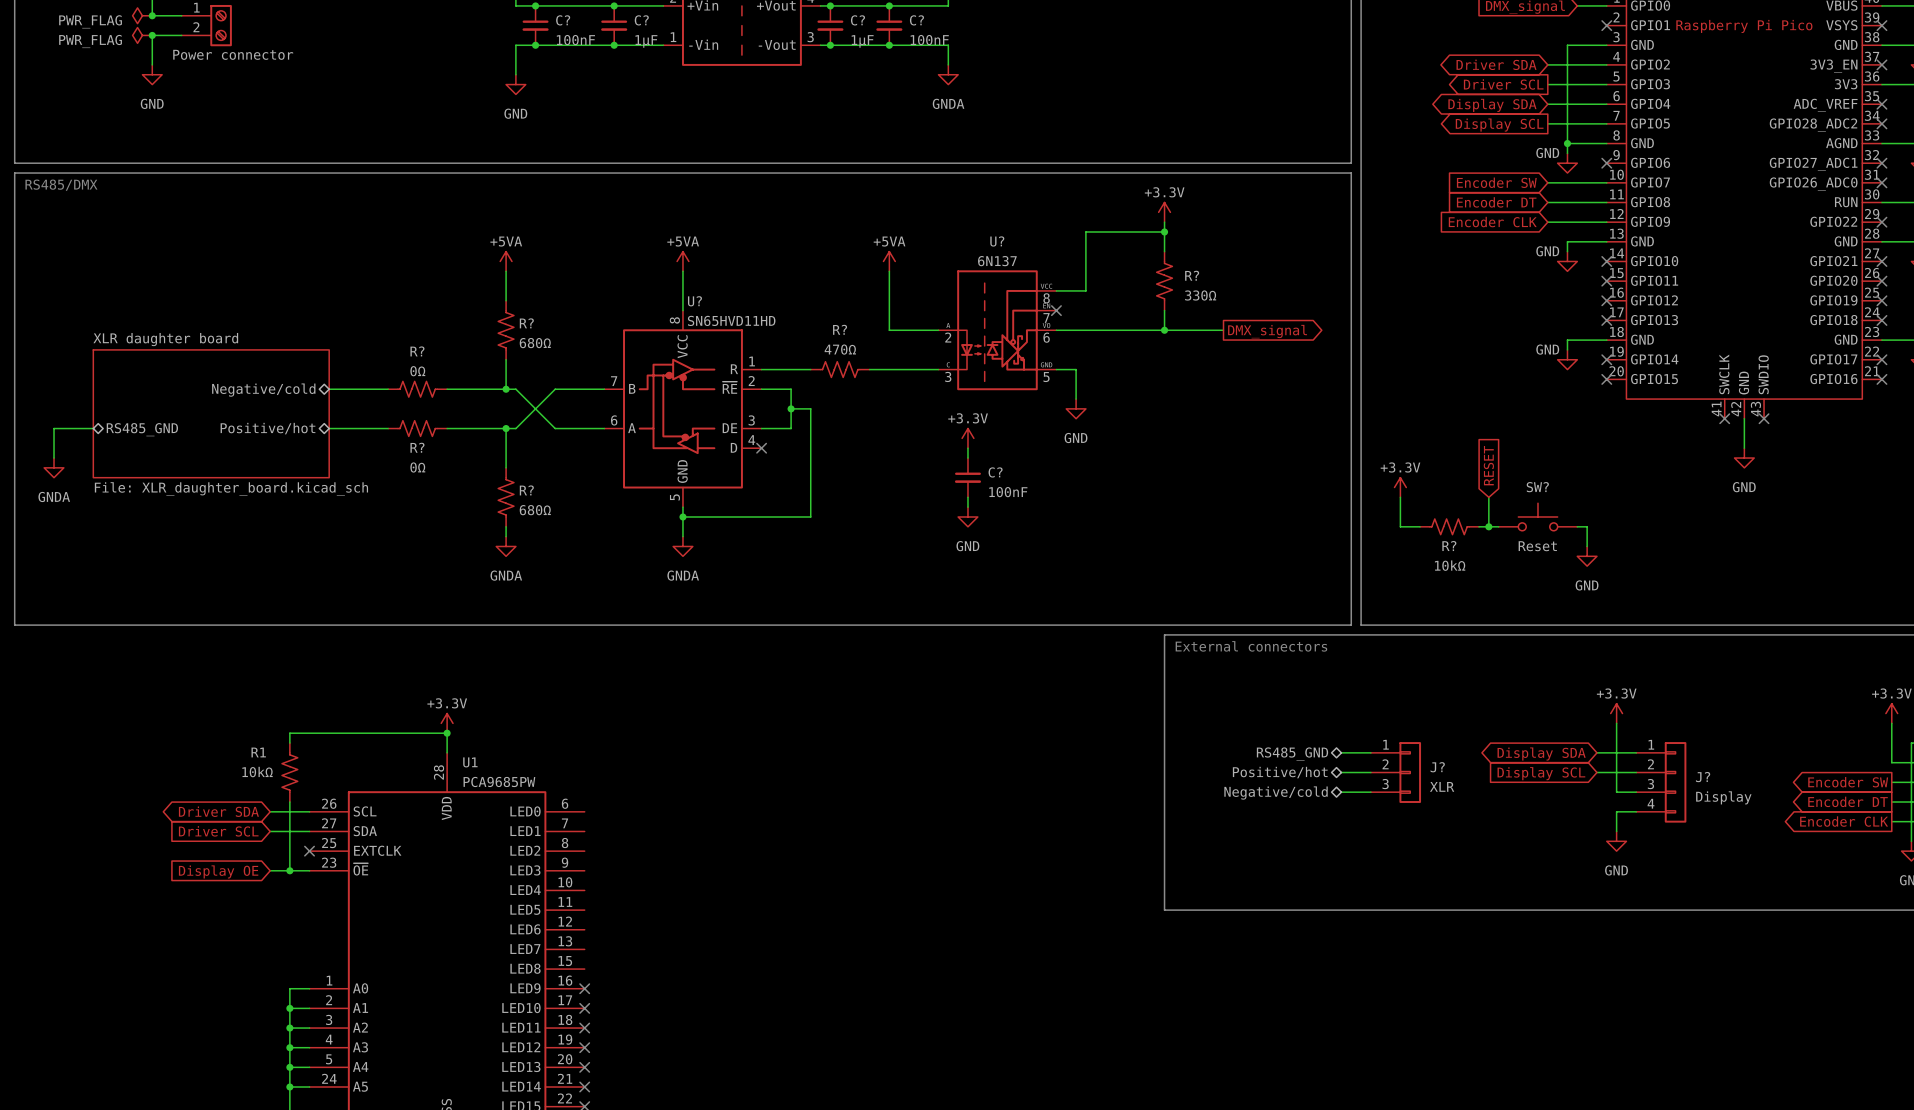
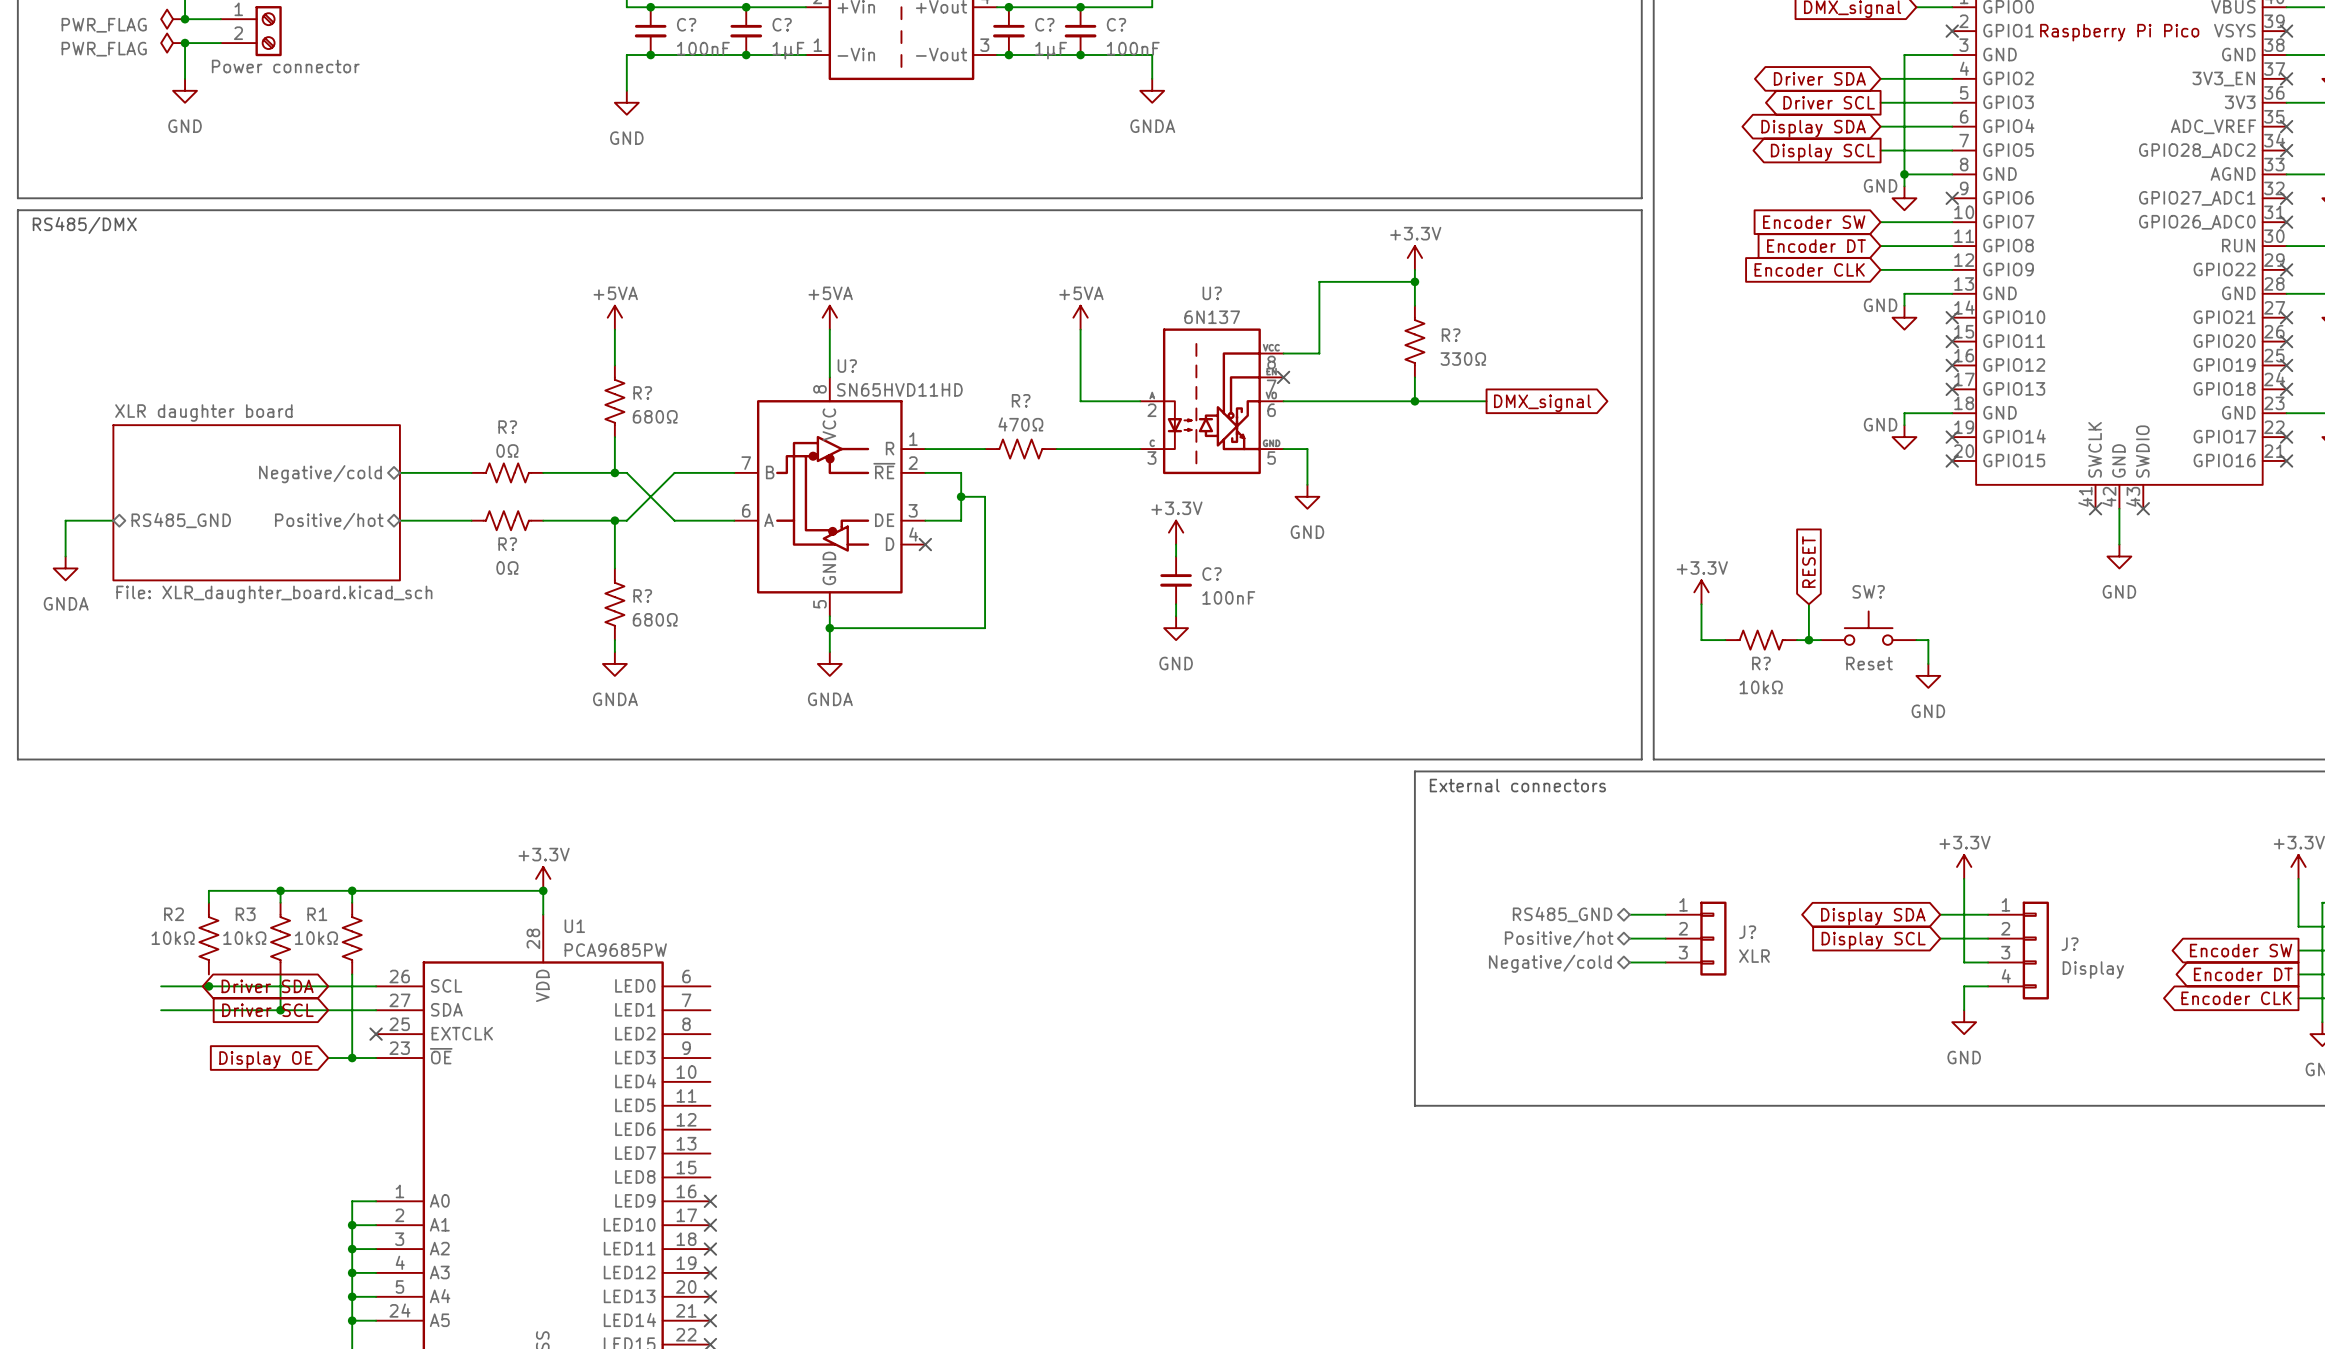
wire: none -> (280, 890) (280, 902)
junction: none -> (280, 890)
wire: none -> (352, 890) (208, 890) (208, 902)
junction: none -> (352, 890)
R2: none -> 10kΩ (208, 938)
R3: none -> 10kΩ (280, 938)
wire: none -> (280, 974) (280, 1010)
wire: none -> (161, 986) (328, 986)
junction: none -> (208, 986)
wire: none -> (161, 1010) (328, 1010)
junction: none -> (280, 1010)

